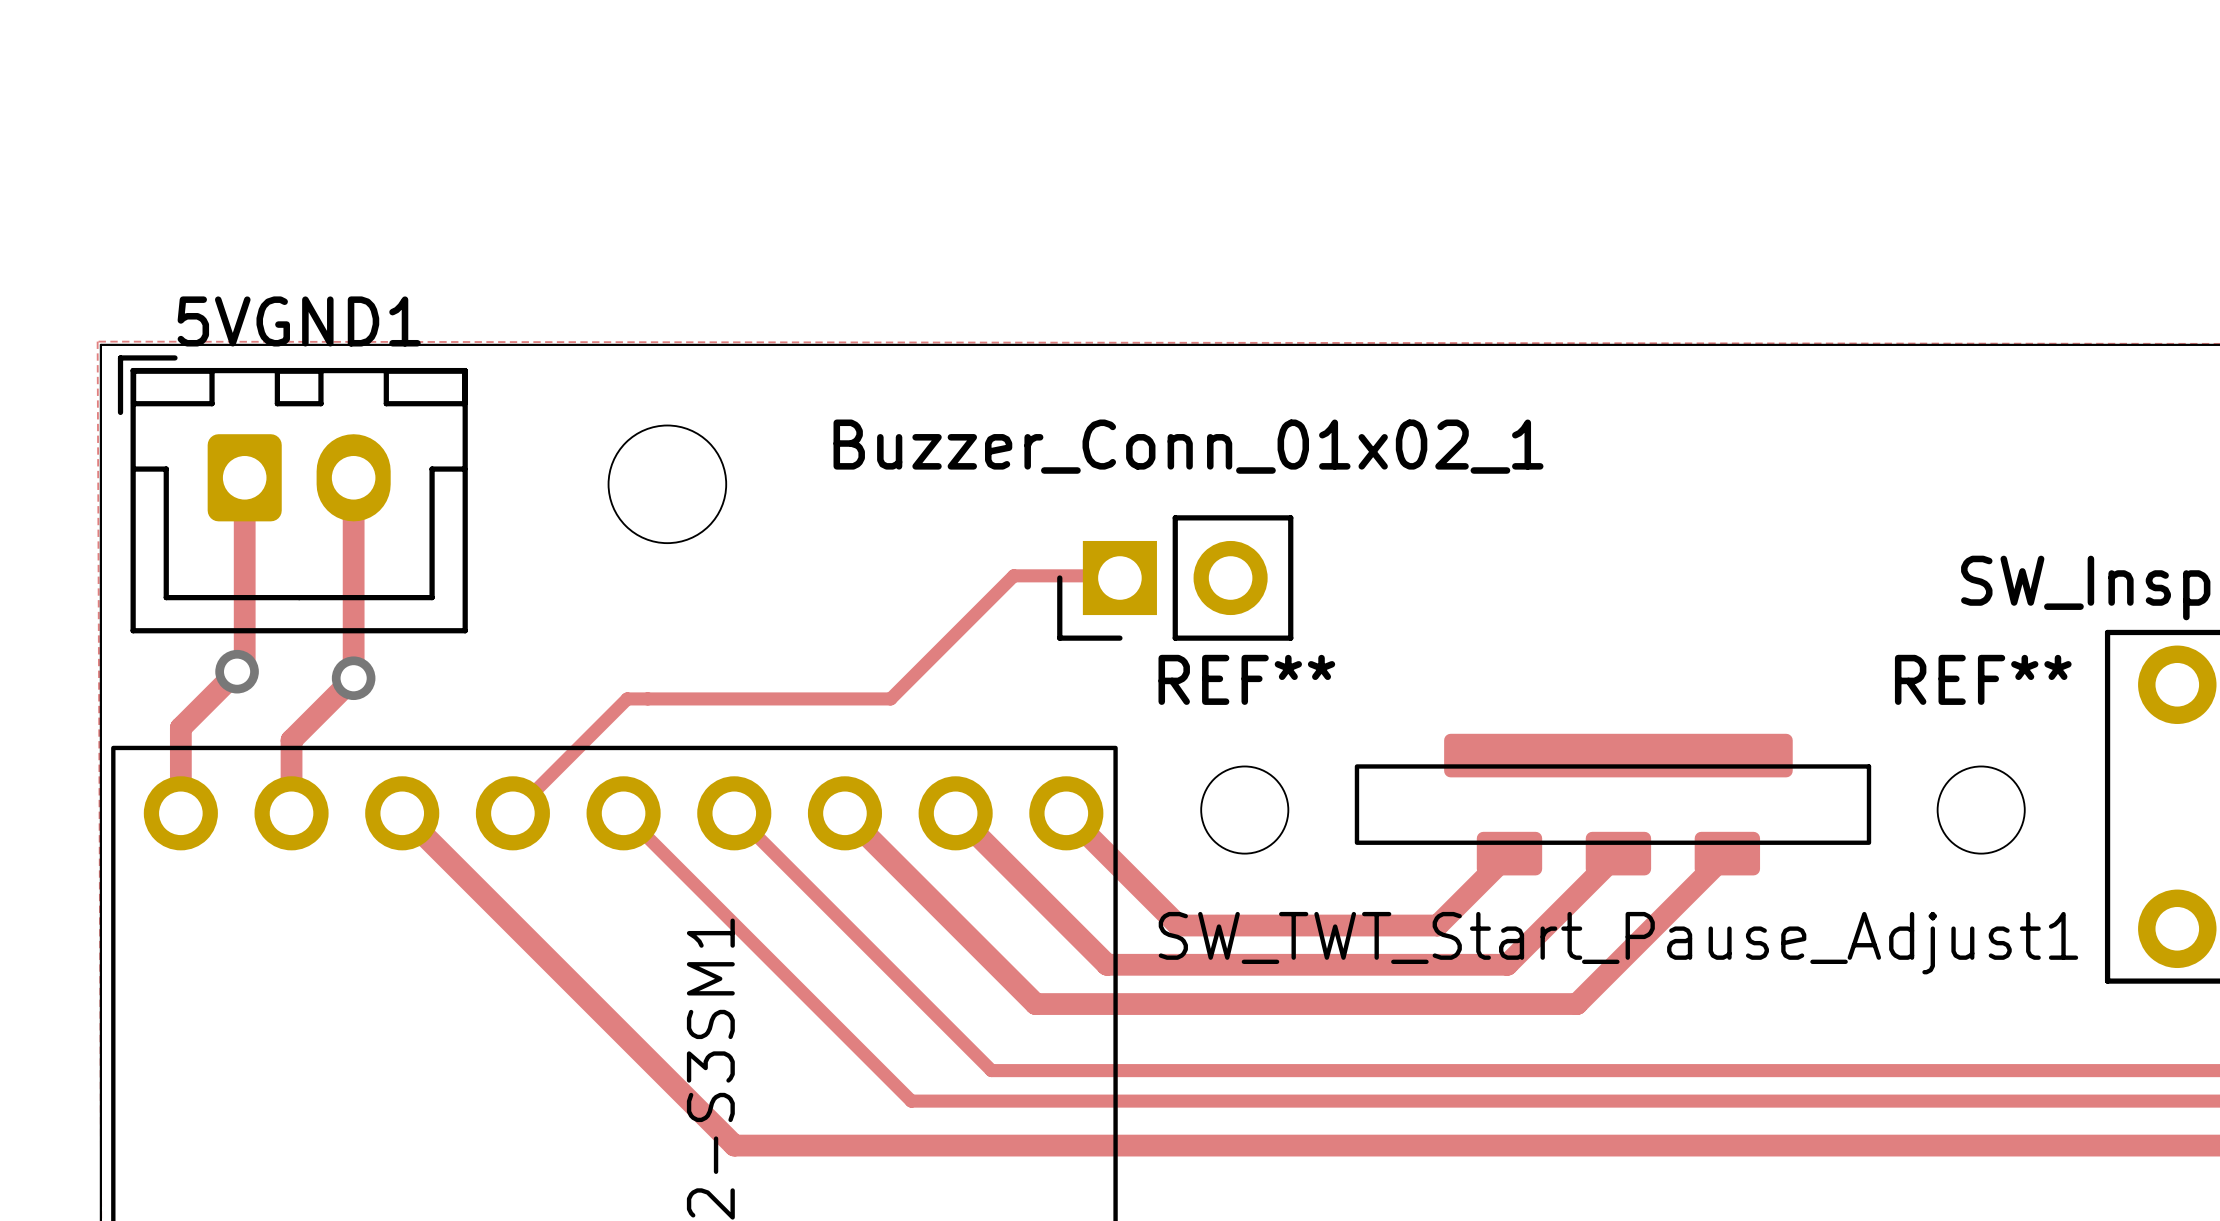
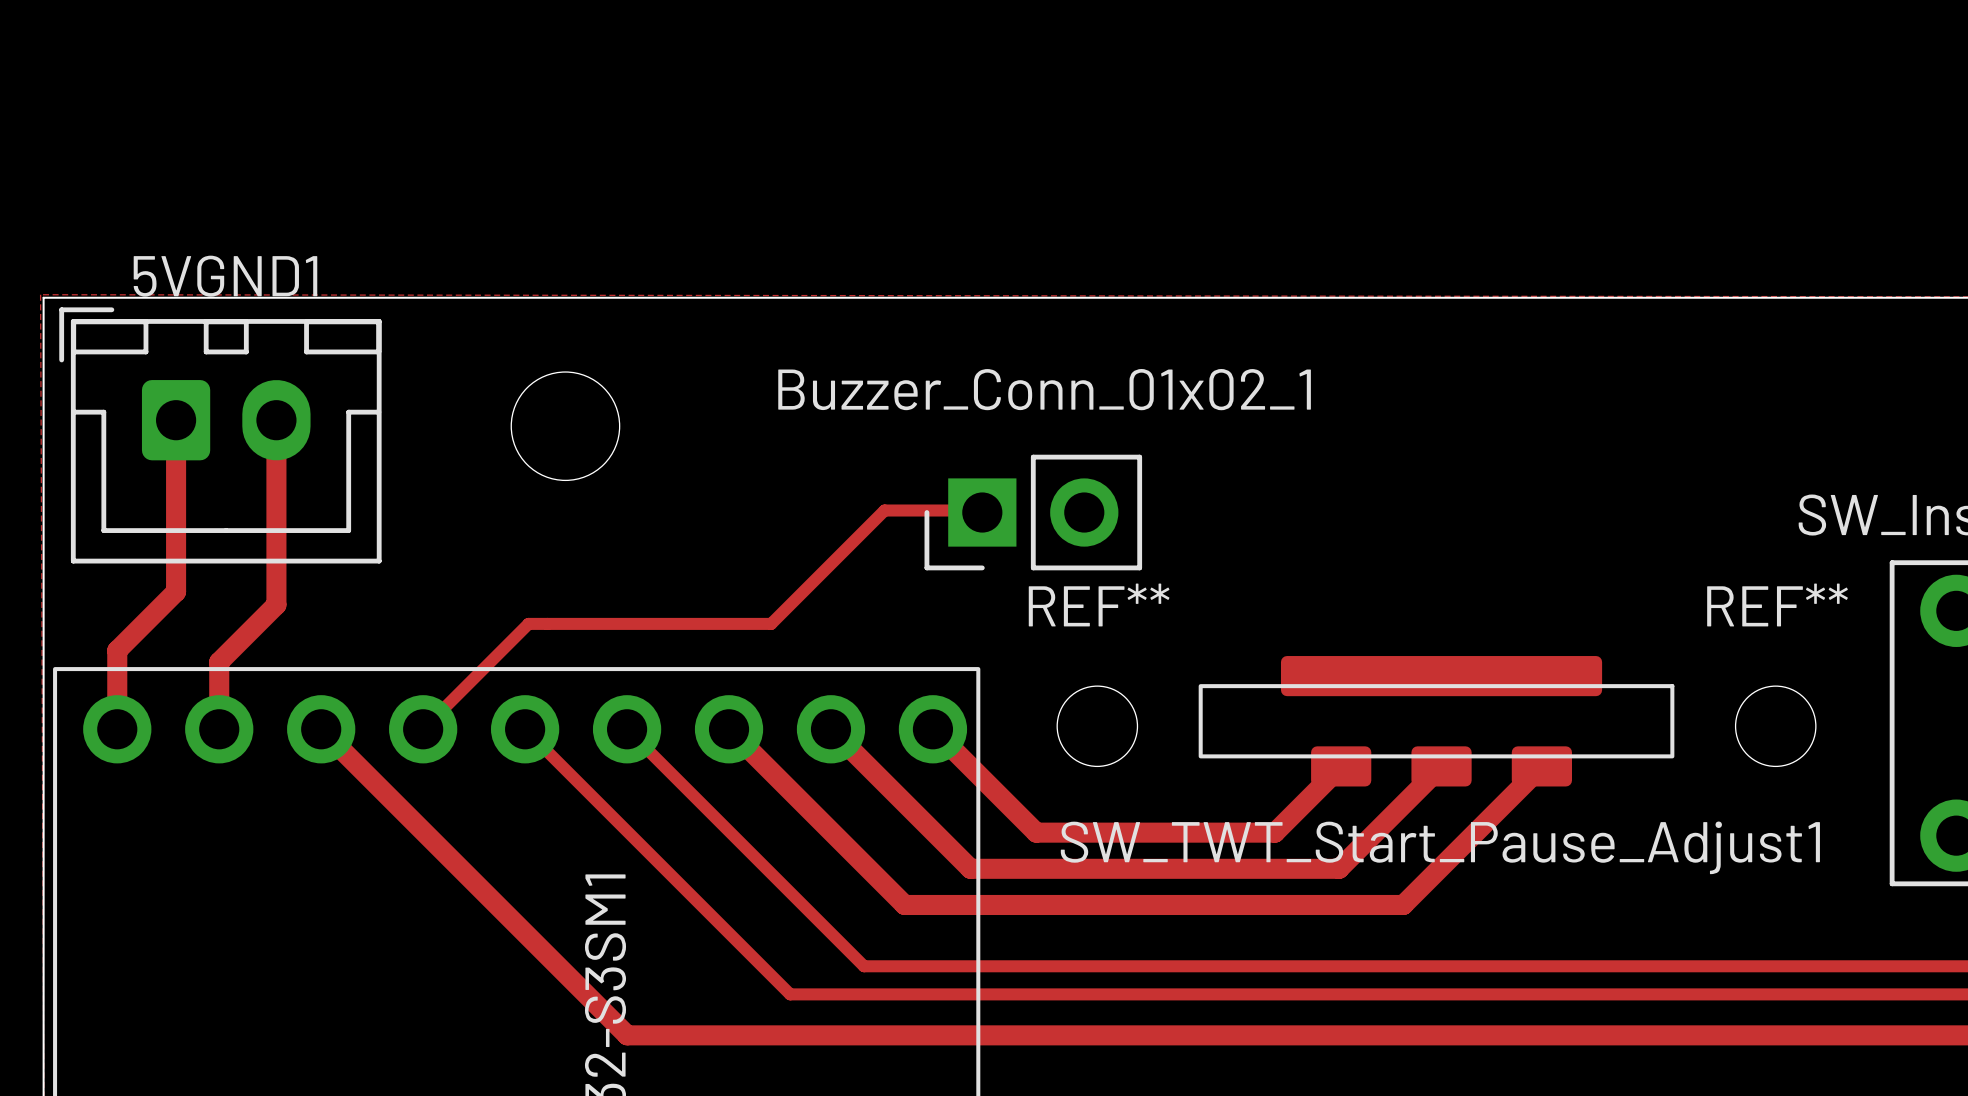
via: (237, 671) -> none
via: (353, 678) -> none

